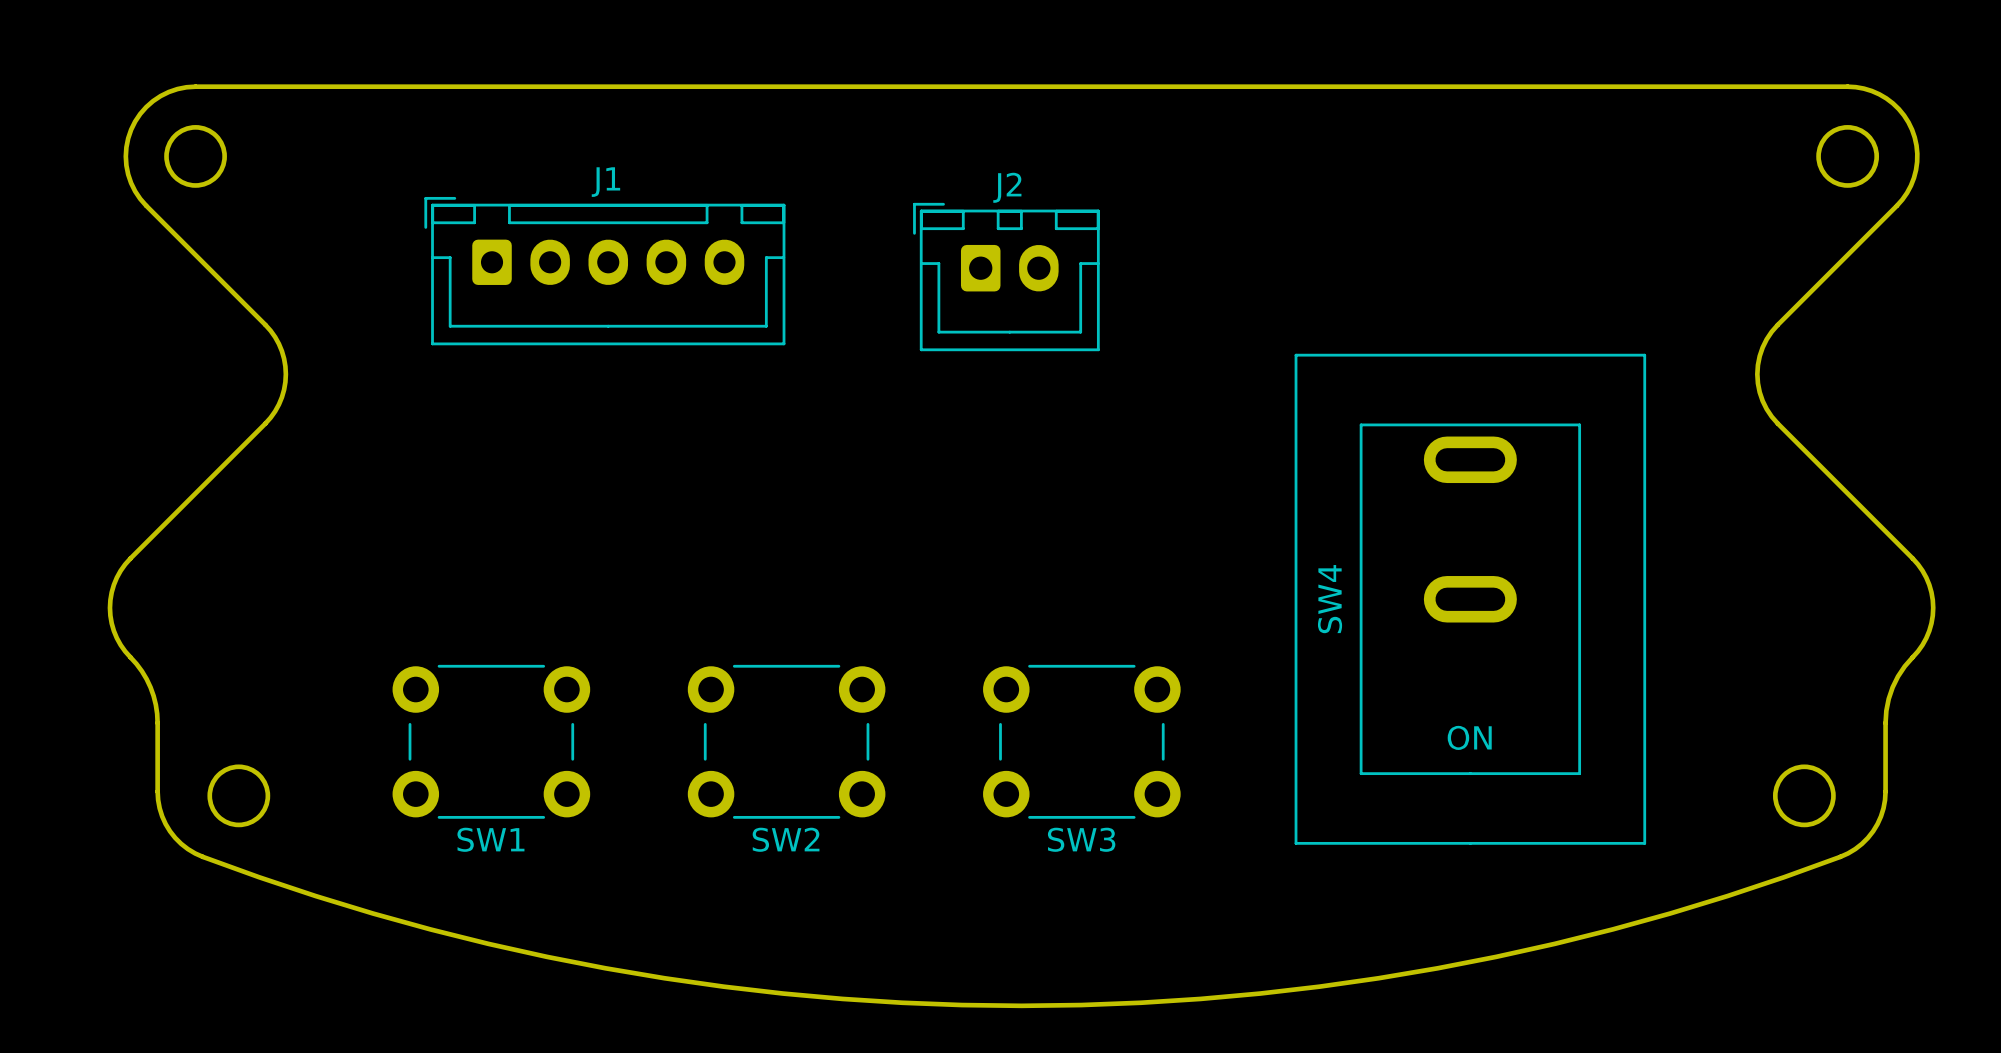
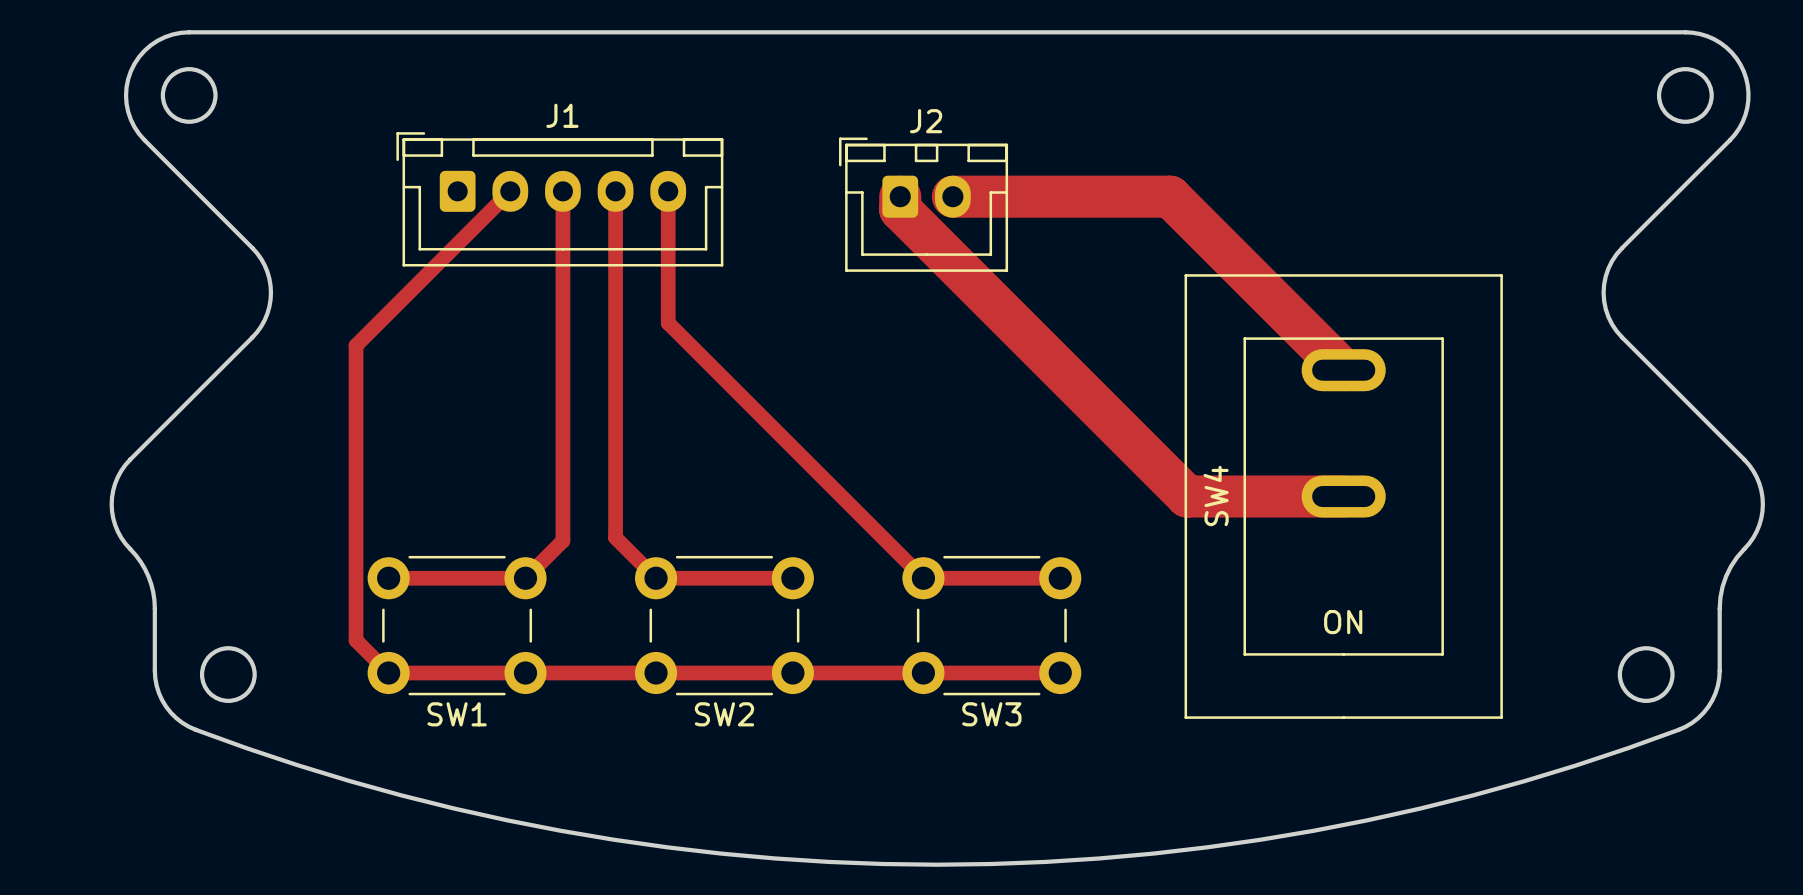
track: none -> (510, 191) (356, 345) (356, 640) (388, 672) (1060, 672)
track: none -> (562, 191) (562, 540) (525, 578) (388, 578)
track: none -> (615, 191) (615, 537) (656, 578) (792, 578)
track: none -> (668, 191) (668, 323) (923, 578) (1060, 578)
track: none -> (900, 196) (900, 209) (1187, 496) (1343, 496)
track: none -> (952, 196) (1170, 196) (1343, 370)

